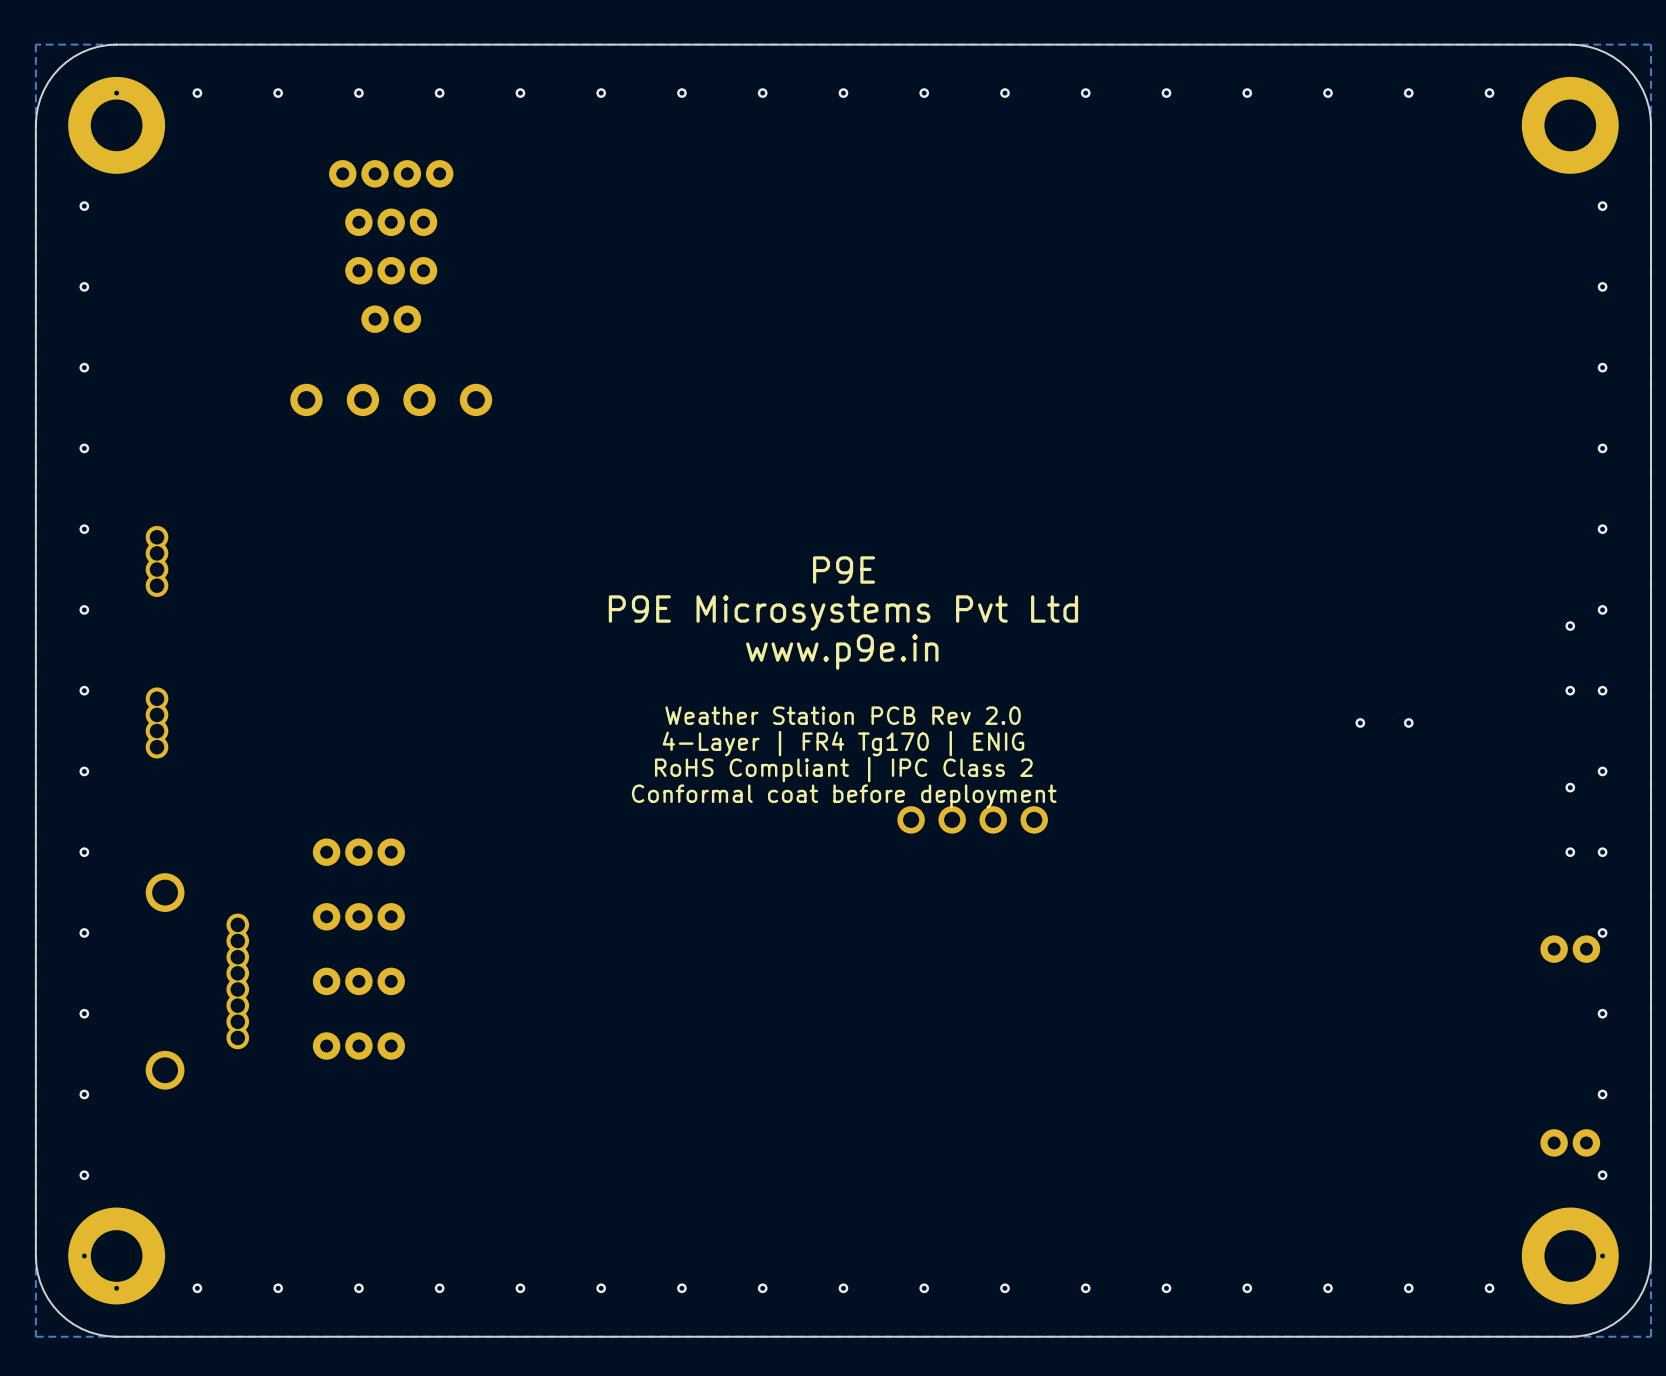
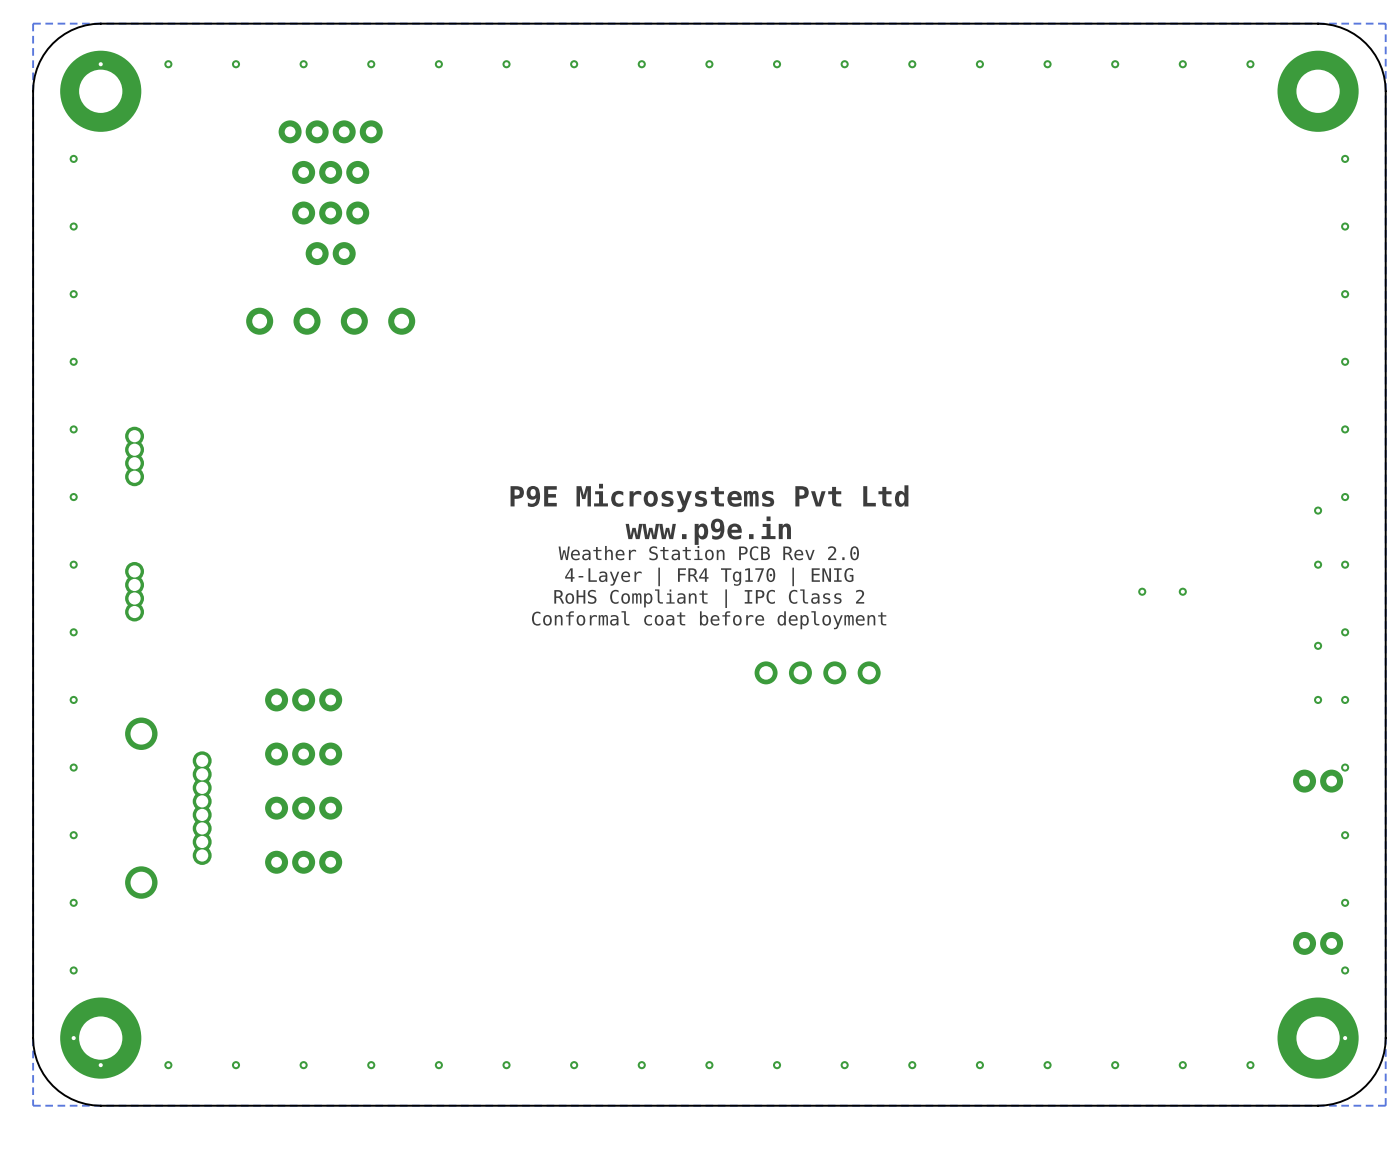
text: P9E (844, 570) -> none
text position: Weather Station PCB Rev 2.0 (843, 715) -> Weather Station PCB Rev 2.0 (708, 553)
text position: 4-Layer | FR4 Tg170 | ENIG (843, 743) -> 4-Layer | FR4 Tg170 | ENIG (709, 576)
text position: RoHS Compliant | IPC Class 2 (843, 769) -> RoHS Compliant | IPC Class 2 (709, 598)
text position: Conformal coat before deployment (844, 796) -> Conformal coat before deployment (709, 620)

